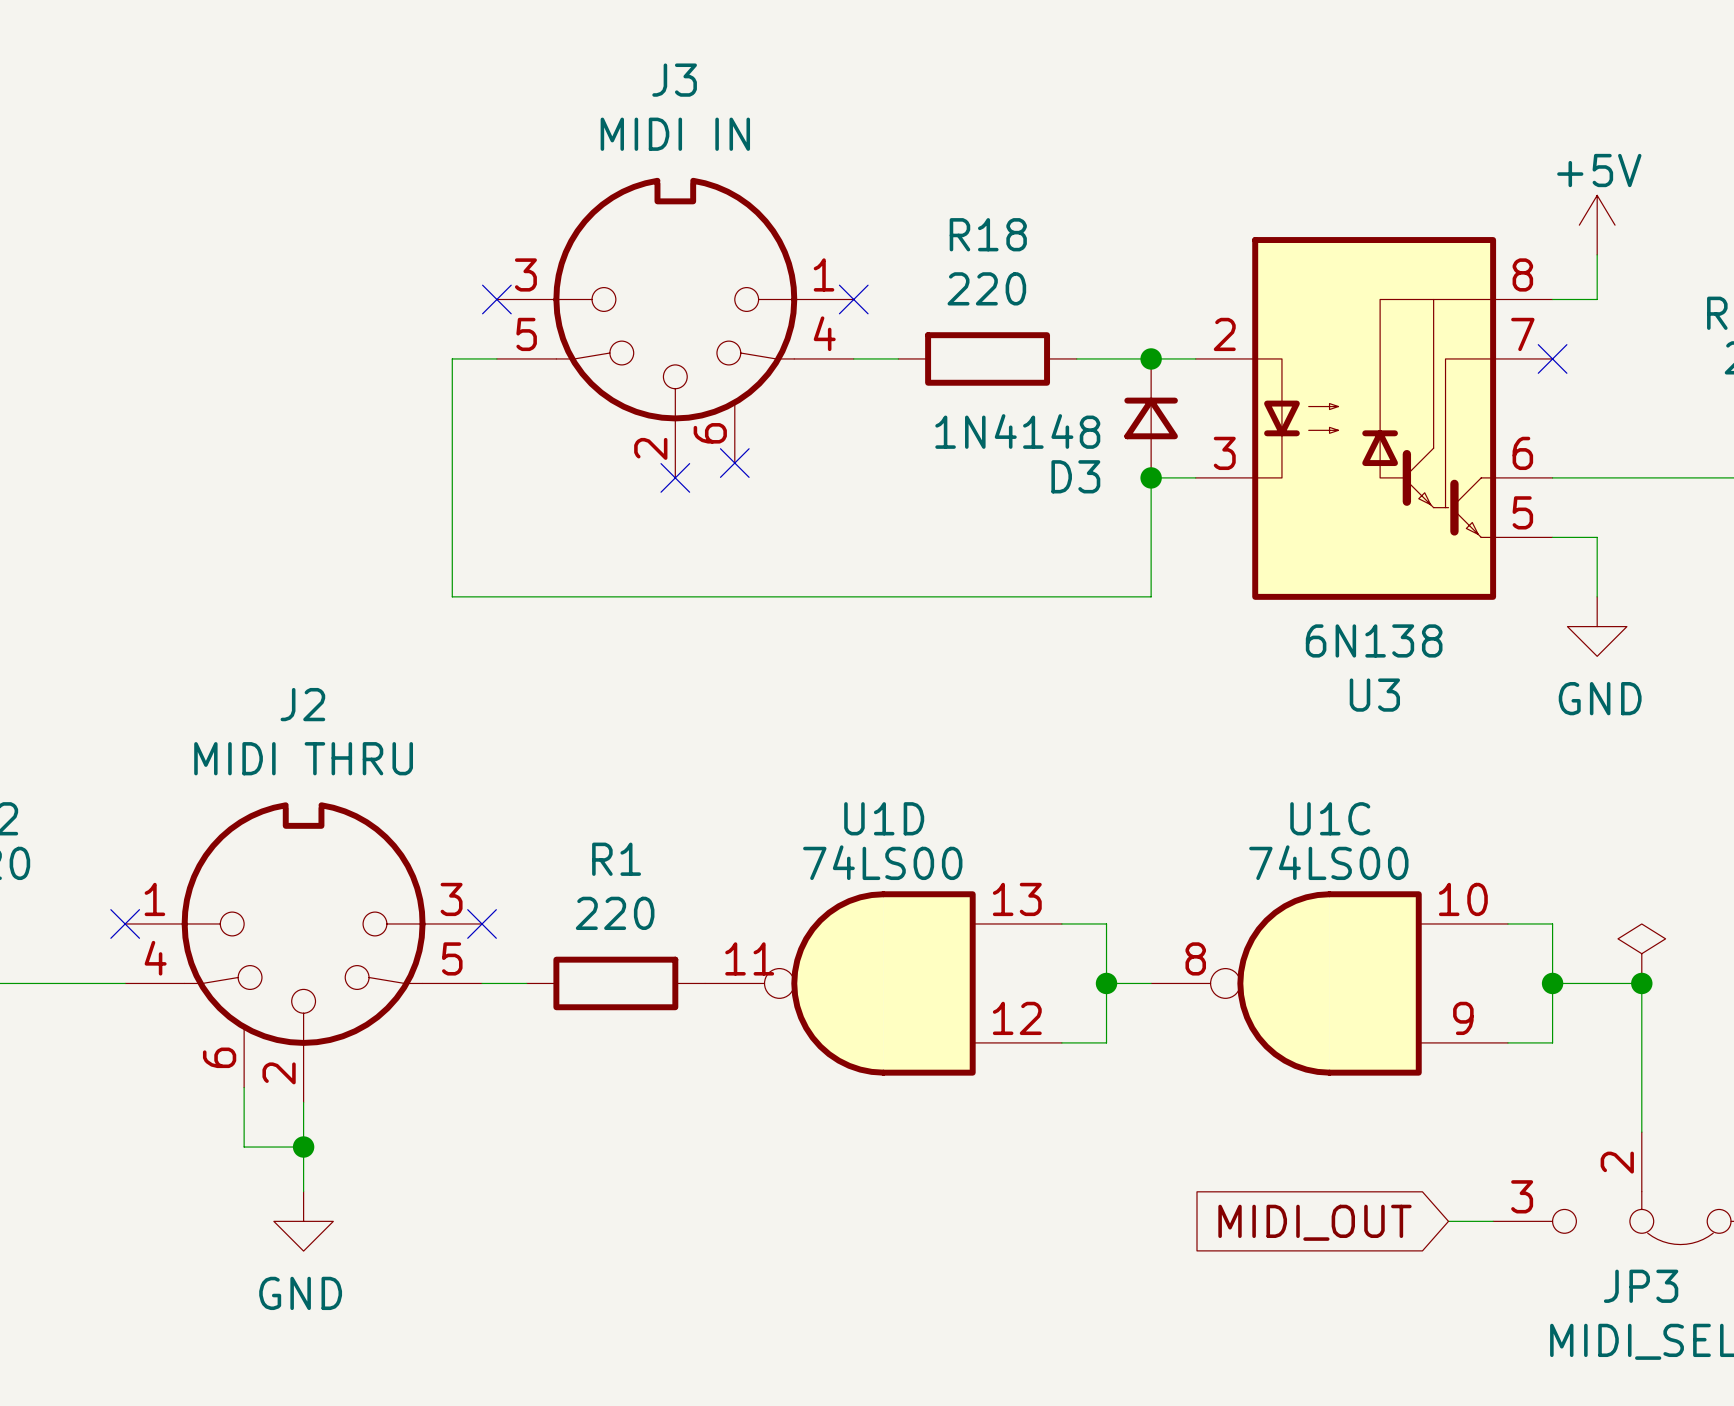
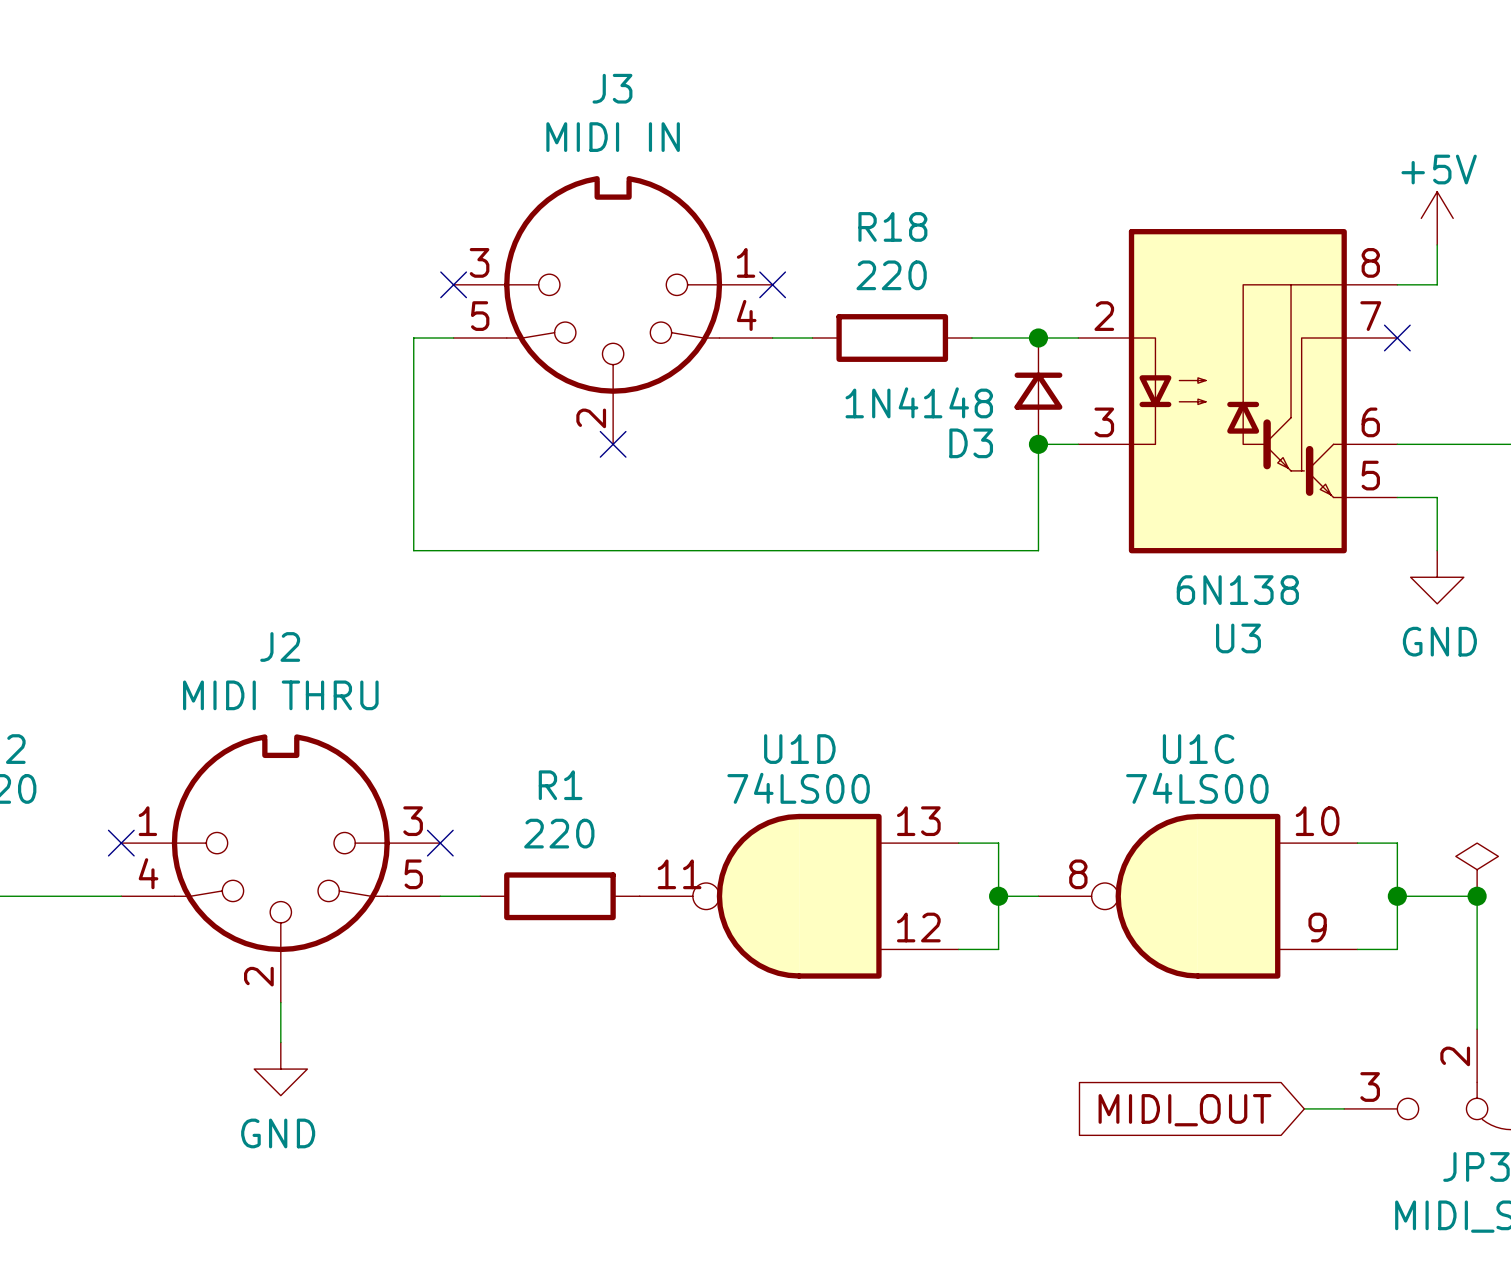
J3 symbol: [496, 177, 854, 478] -> [453, 176, 773, 445]
no-connect mark: (734, 463) -> none
J2 symbol: [125, 802, 483, 1103] -> [121, 734, 441, 1003]
wire: (244, 1087) (244, 1147) (303, 1147) (303, 1191) -> none
junction: (303, 1147) -> none
power symbol position: GND (303, 1221) -> GND (280, 1069)

